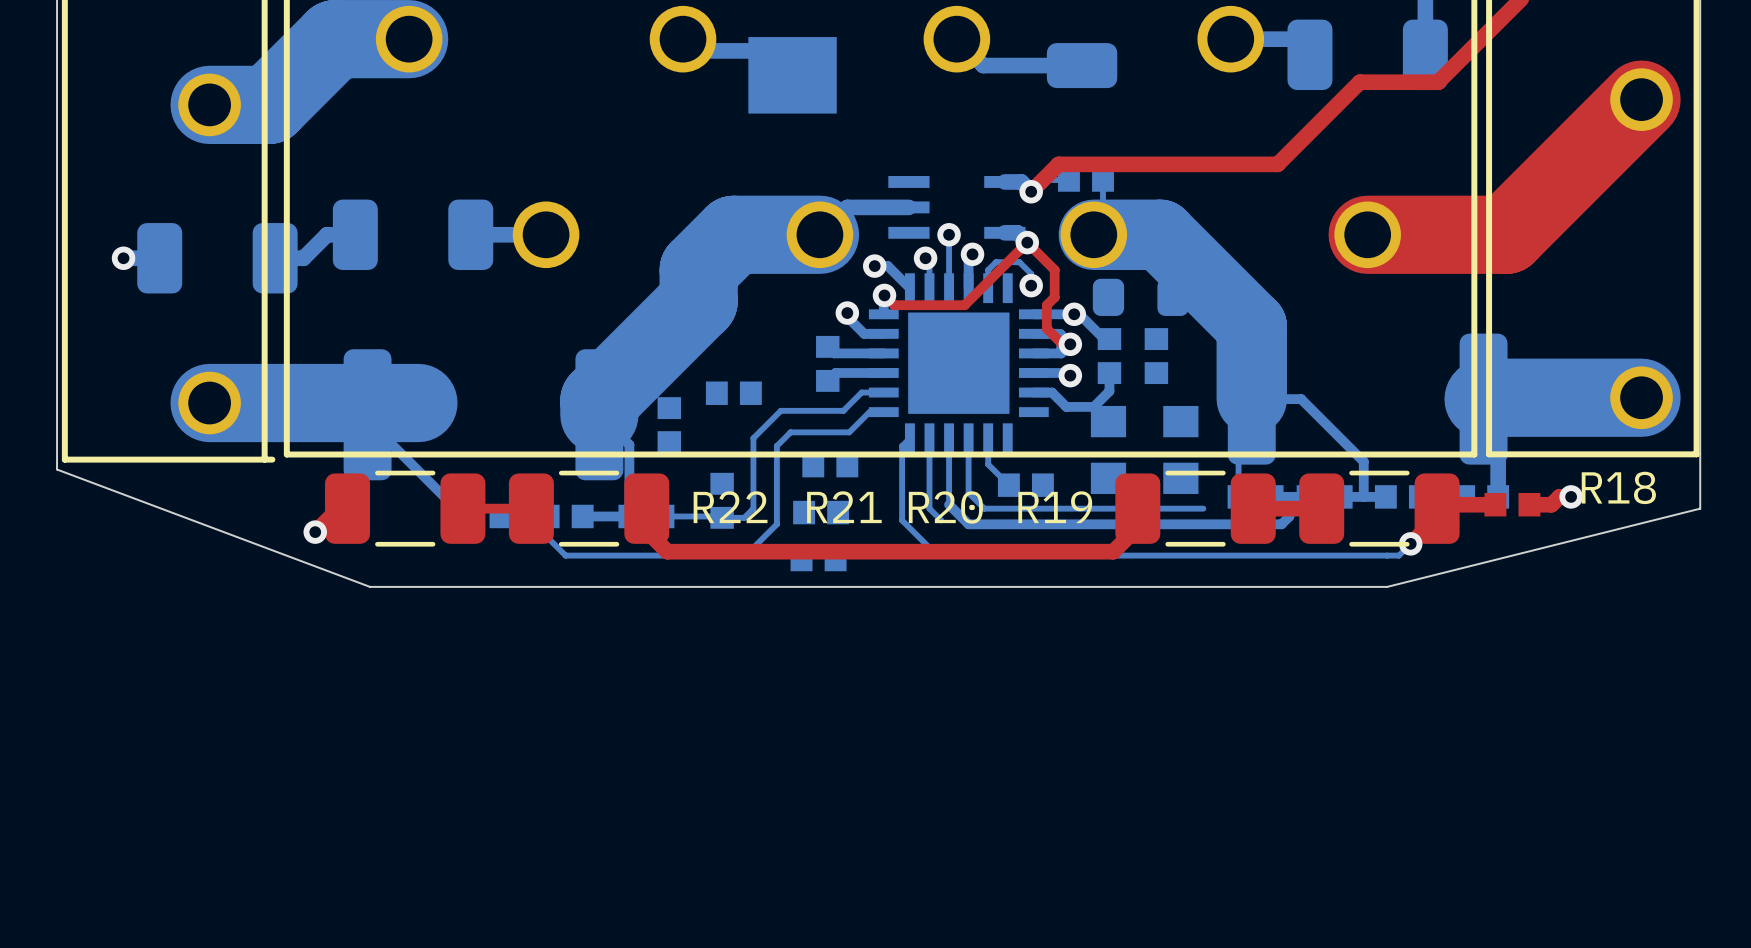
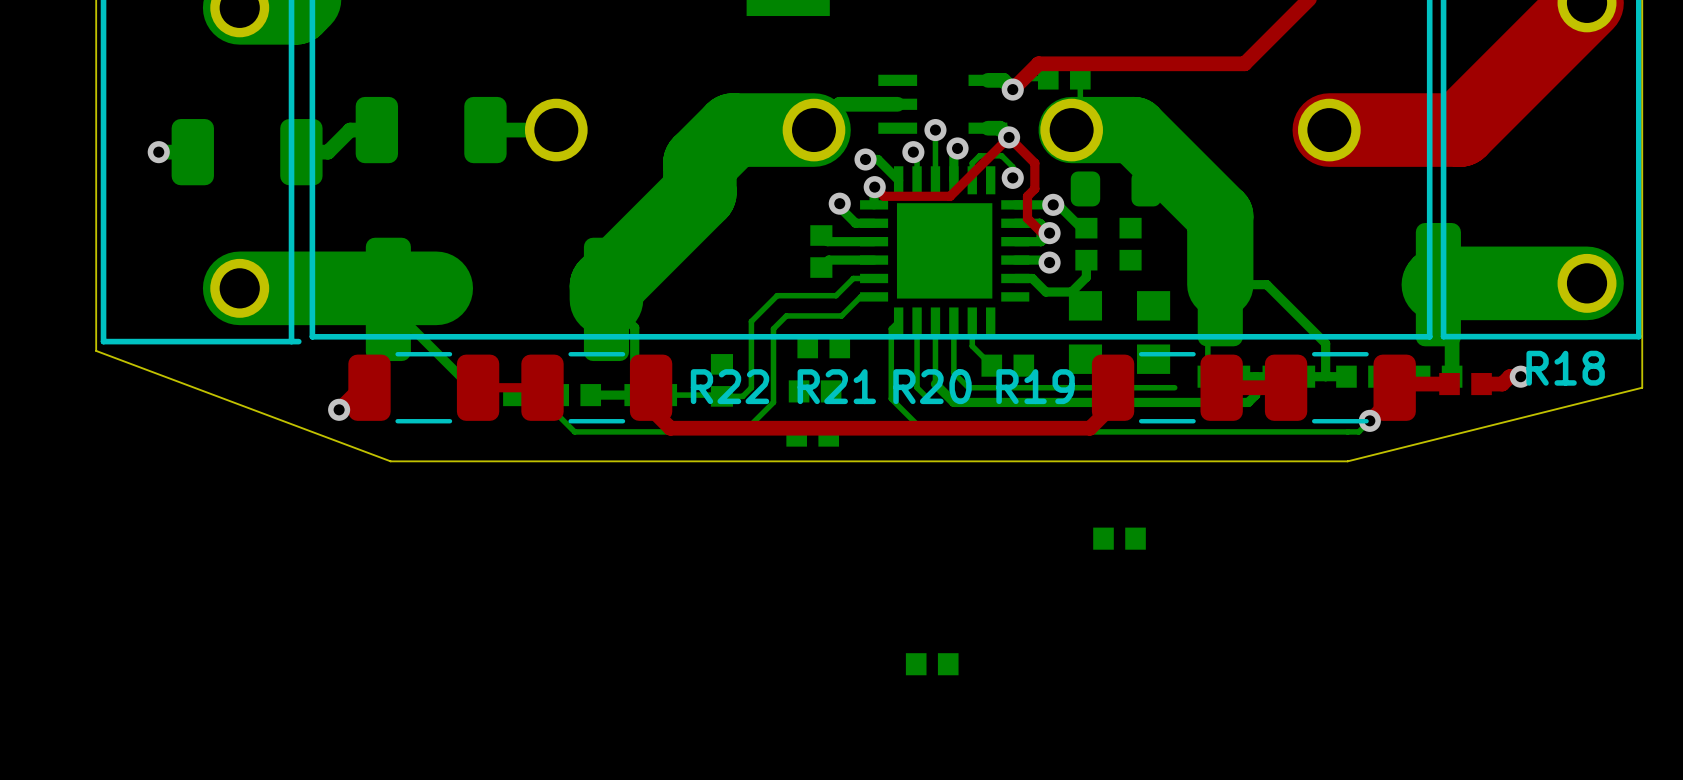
part: (733, 393) -> none
part: (669, 425) -> none
part: none -> (1119, 538)
part: none -> (932, 664)

